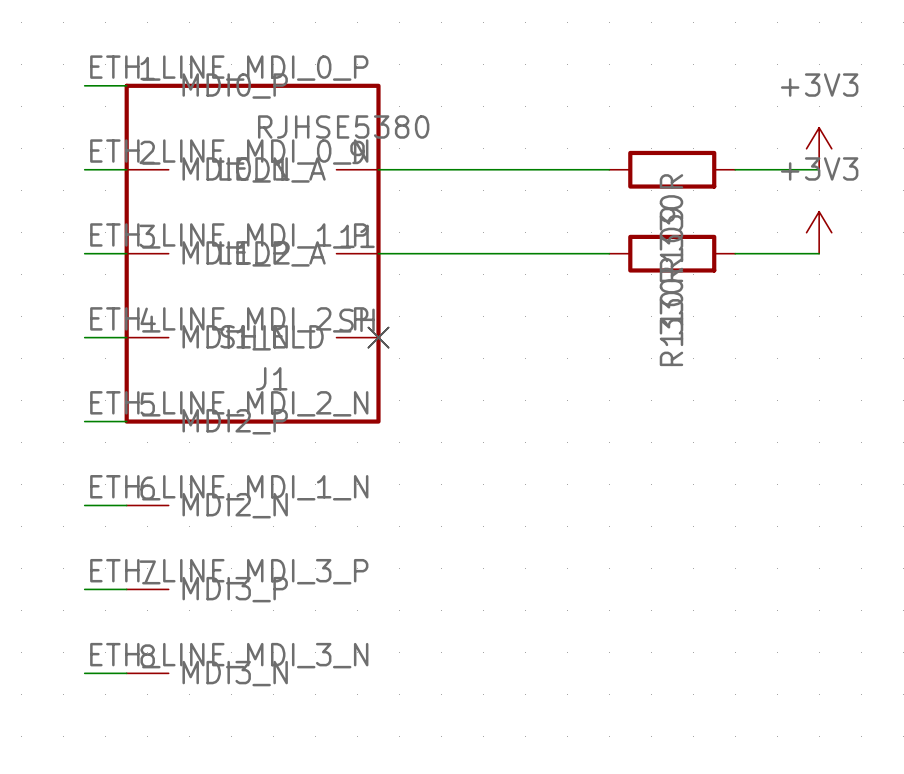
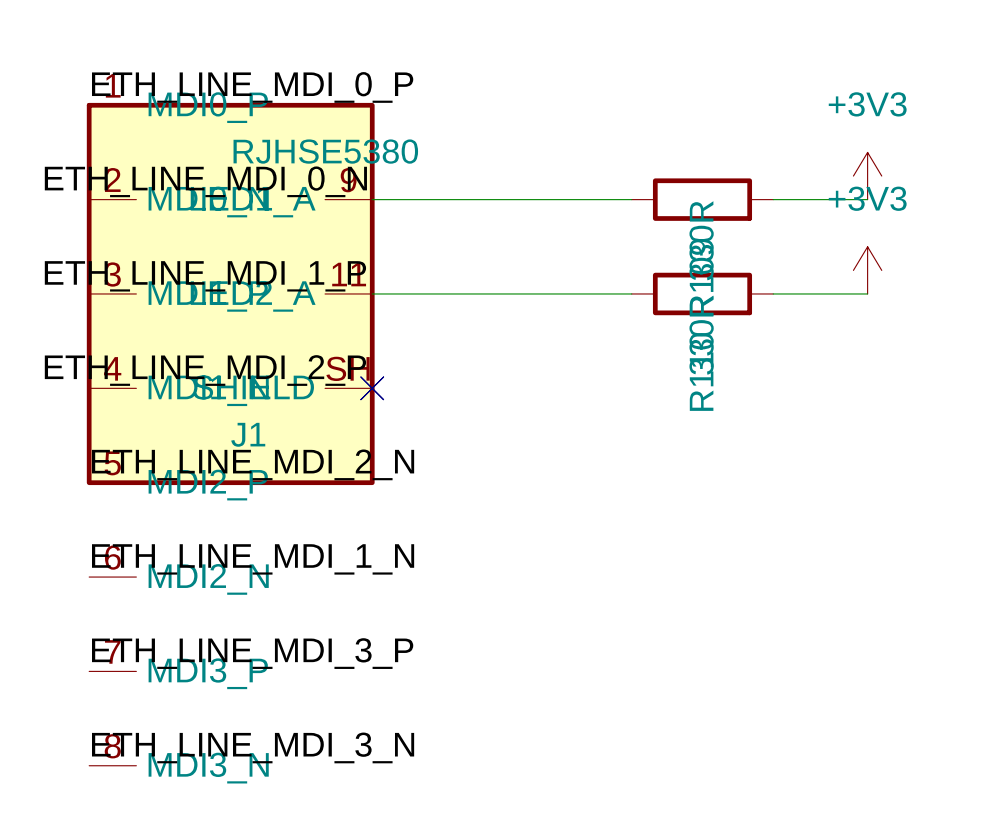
label position: ETH_LINE_MDI_0_P (229, 68) -> ETH_LINE_MDI_0_P (252, 87)
wire: (84, 85) (126, 85) -> none
wire: (84, 169) (126, 169) -> none
wire: (84, 253) (126, 253) -> none
wire: (84, 337) (126, 337) -> none
label position: ETH_LINE_MDI_2_N (229, 403) -> ETH_LINE_MDI_2_N (253, 464)
wire: (84, 421) (126, 421) -> none
label position: ETH_LINE_MDI_1_N (229, 487) -> ETH_LINE_MDI_1_N (253, 559)
wire: (84, 505) (126, 505) -> none
label position: ETH_LINE_MDI_3_P (229, 571) -> ETH_LINE_MDI_3_P (252, 653)
wire: (84, 589) (126, 589) -> none
label position: ETH_LINE_MDI_3_N (229, 655) -> ETH_LINE_MDI_3_N (253, 747)
wire: (84, 673) (126, 673) -> none

